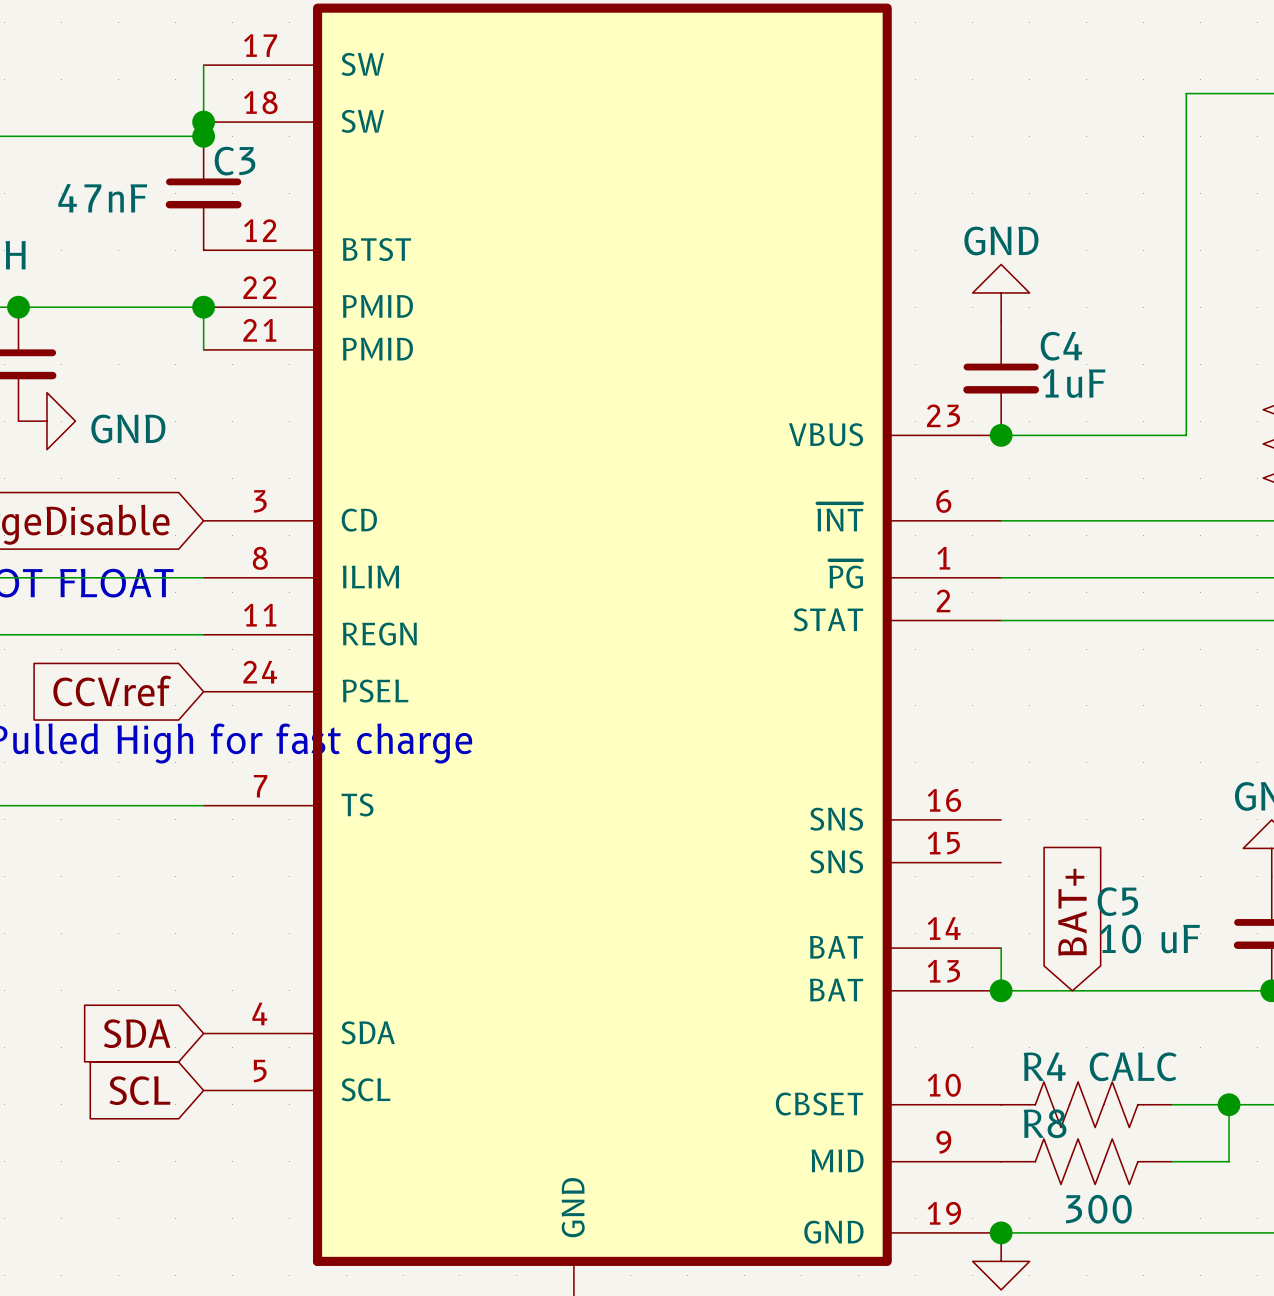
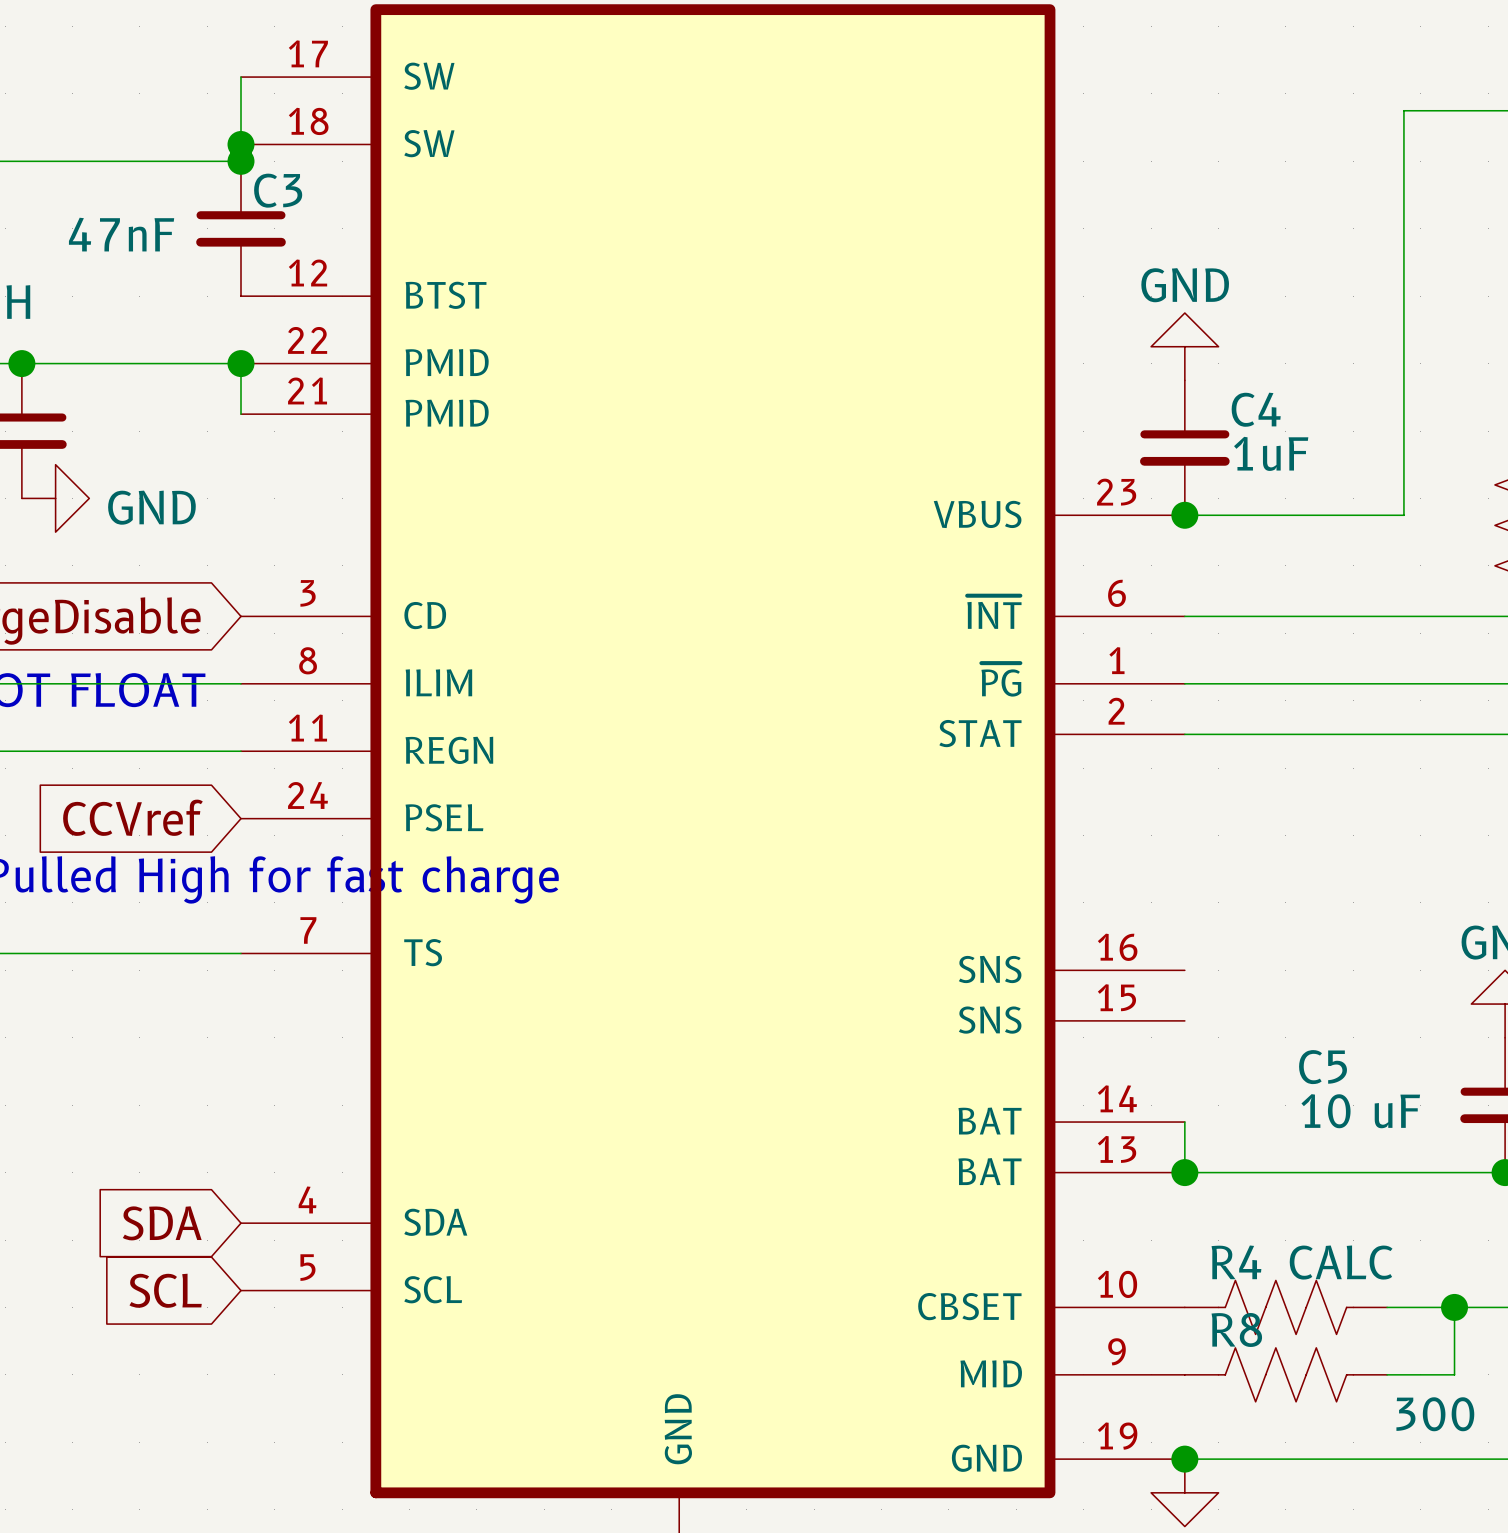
global label: BAT+ (1072, 912) -> none
R8 value position: 300 (1098, 1209) -> 300 (1435, 1414)

